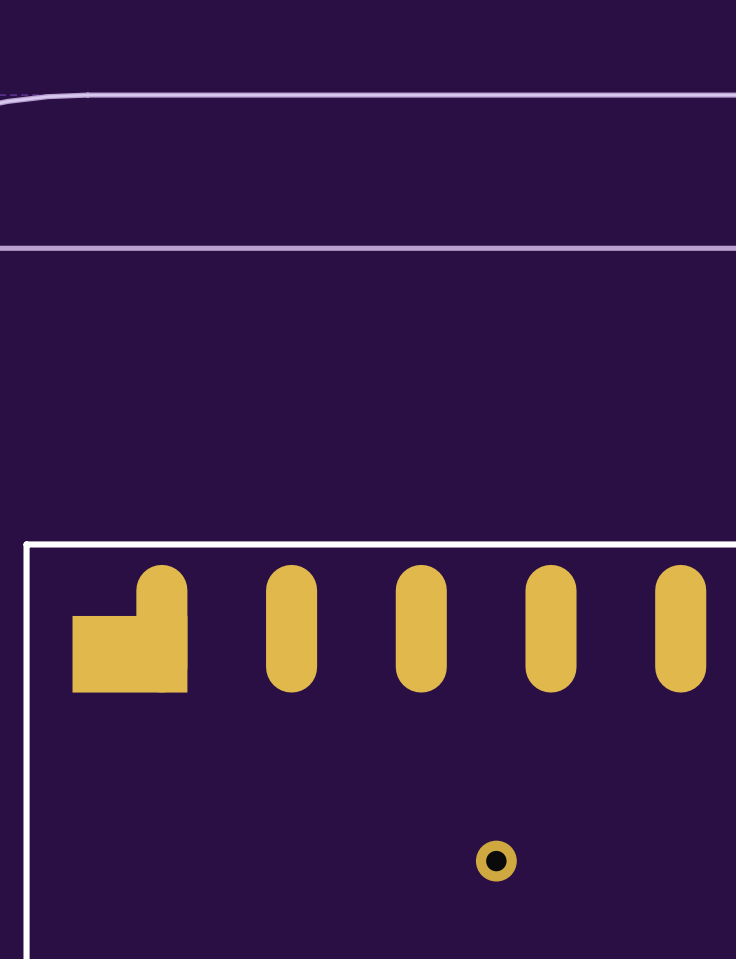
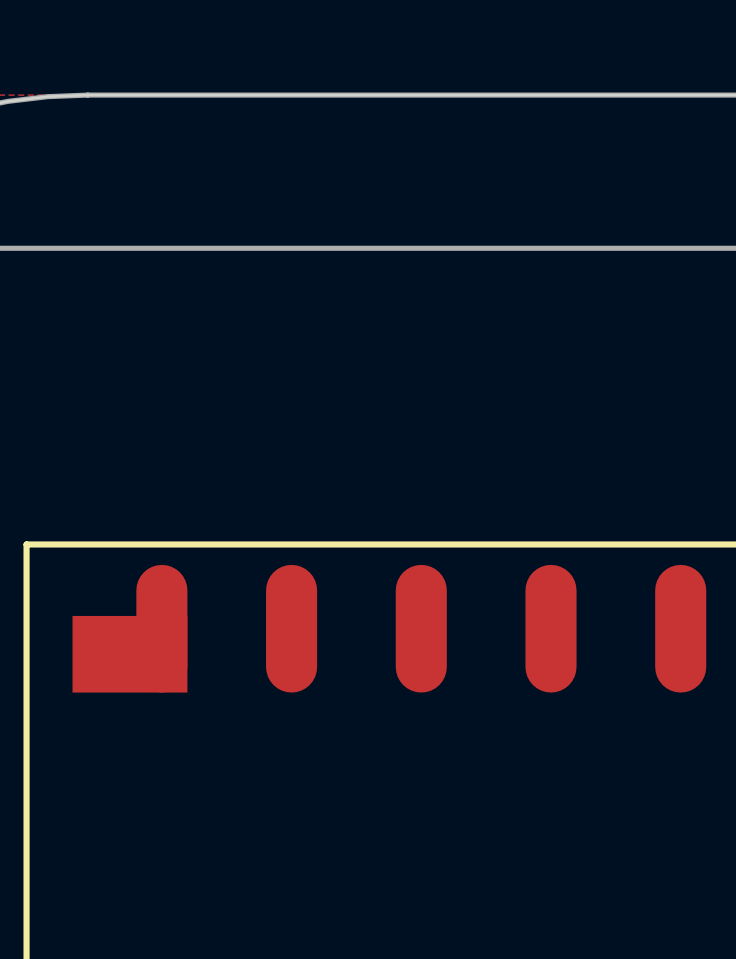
via: (496, 861) -> none

